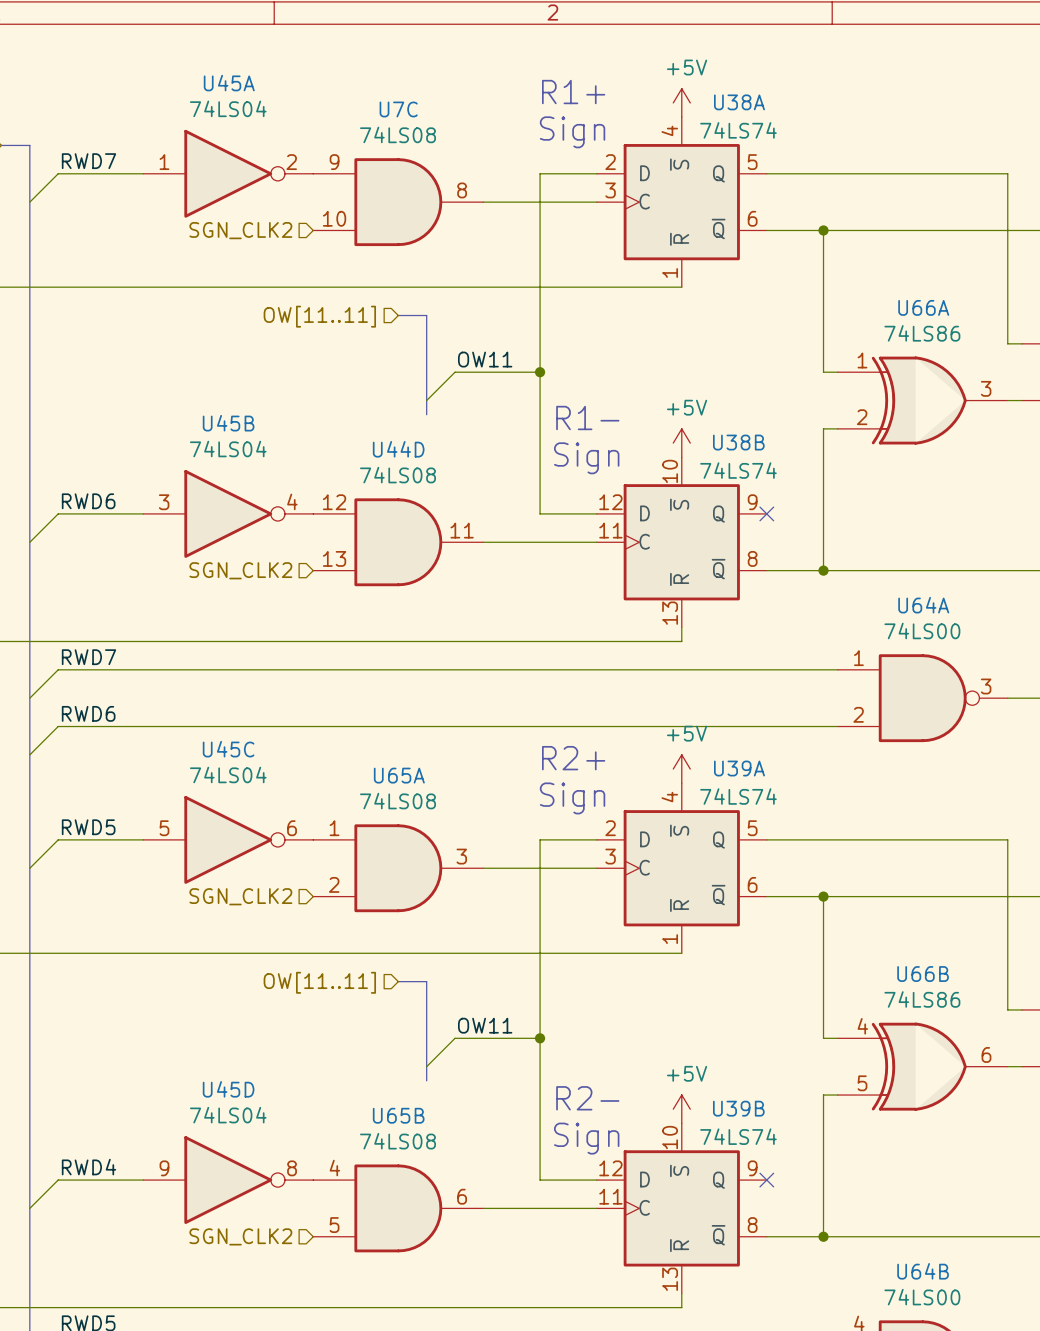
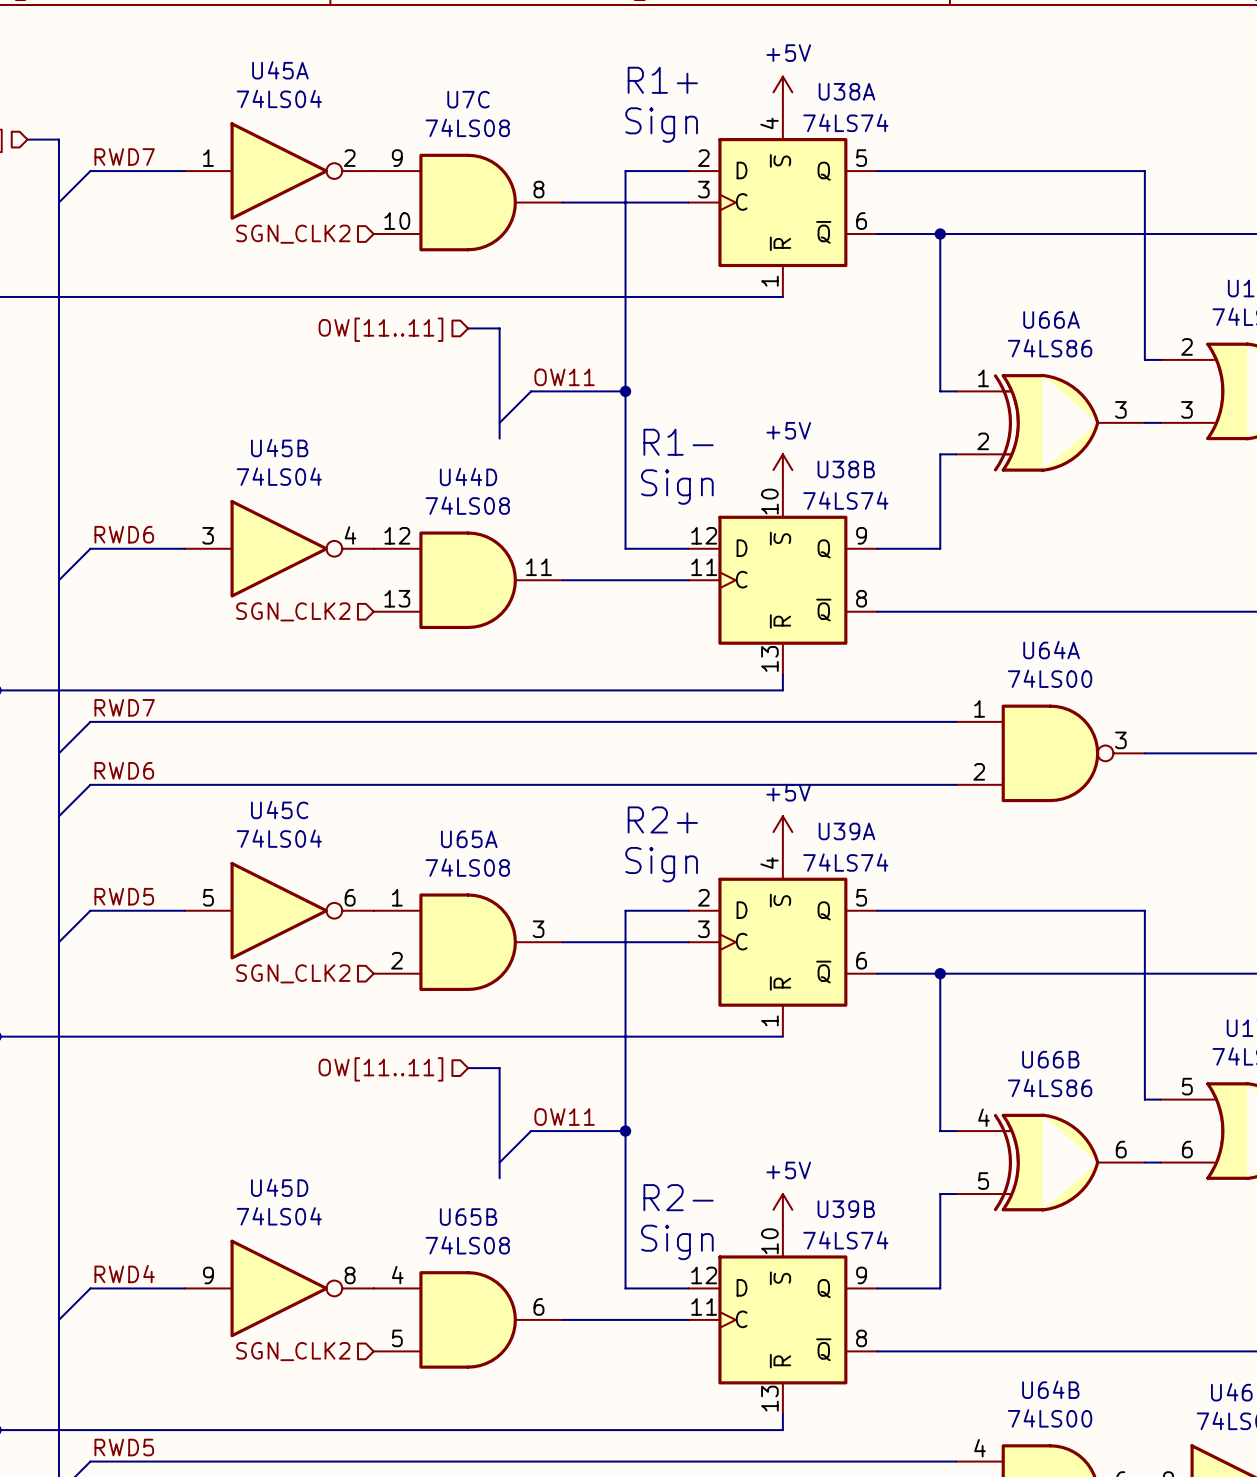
no-connect mark: (766, 513) -> none
wire: (823, 513) (823, 570) -> (940, 548) (877, 548)
junction: (823, 570) -> none
no-connect mark: (766, 1180) -> none
wire: (823, 1180) (823, 1236) -> (940, 1288) (877, 1288)
junction: (823, 1236) -> none

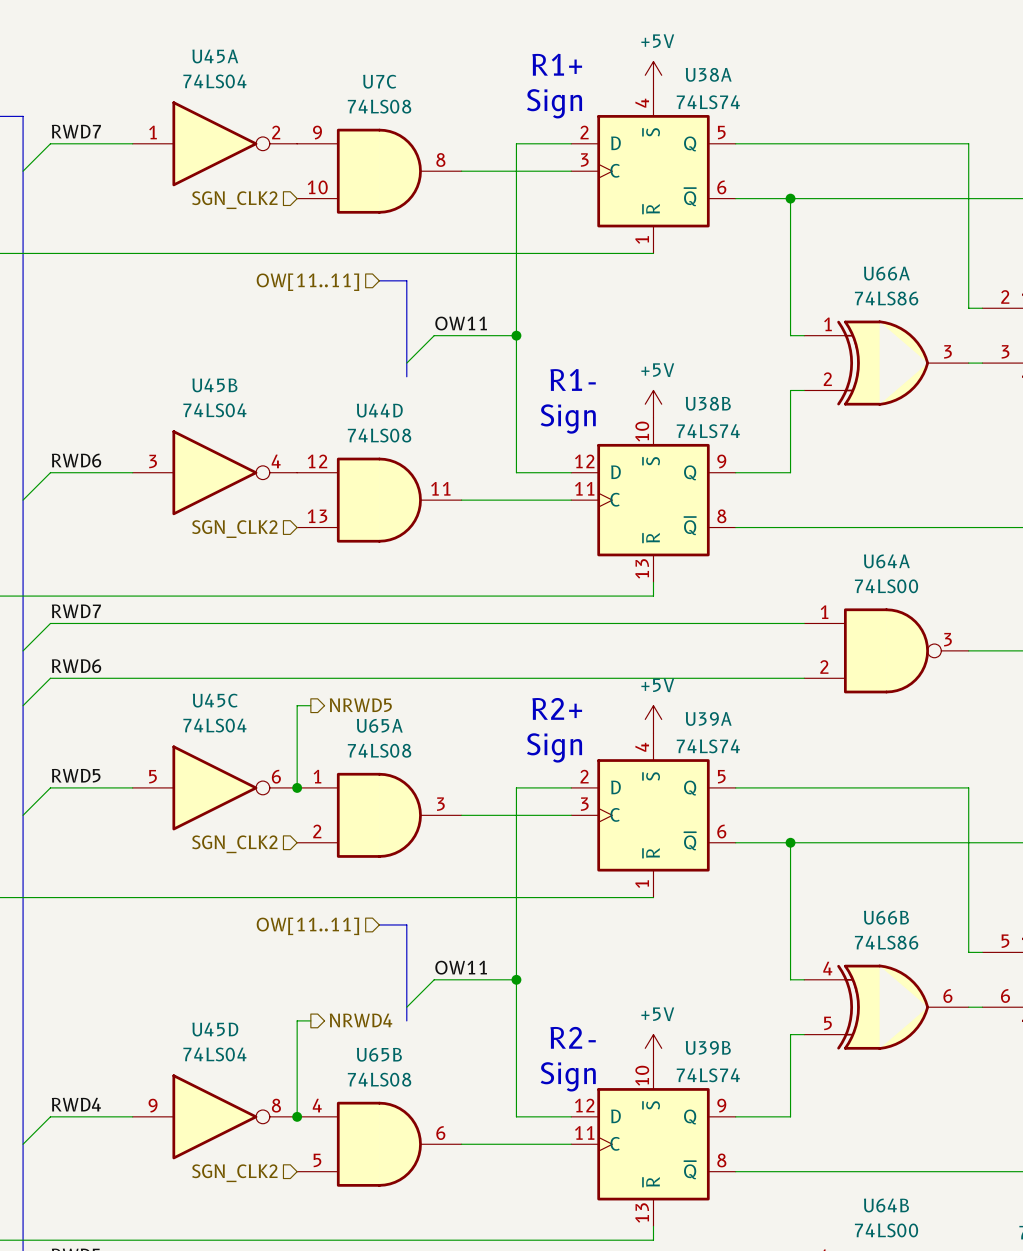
hierarchical label: none -> NRWD5 (360, 705)
wire: none -> (310, 705) (297, 705) (297, 787)
junction: none -> (297, 787)
hierarchical label: none -> NRWD4 (361, 1020)
wire: none -> (310, 1020) (297, 1020) (297, 1116)
junction: none -> (297, 1116)

